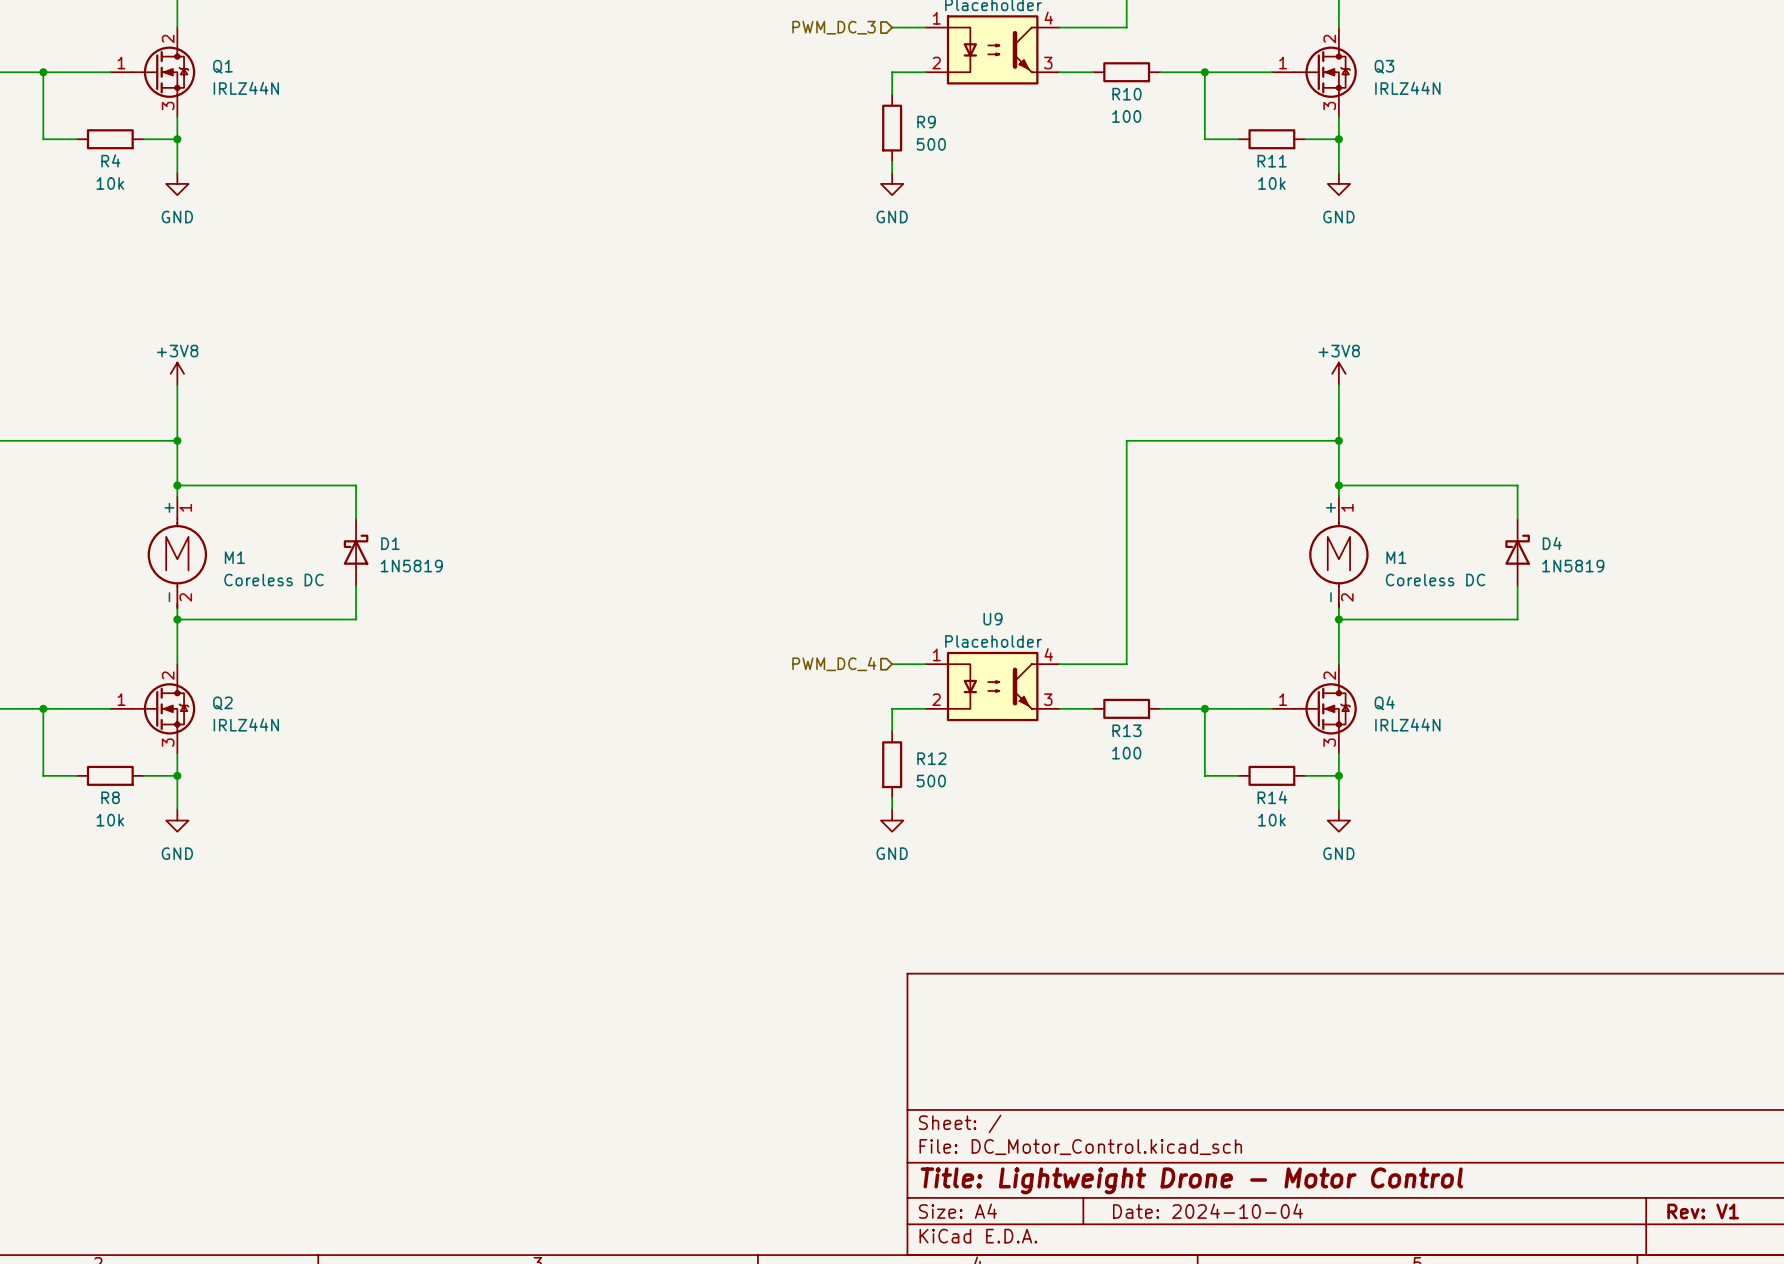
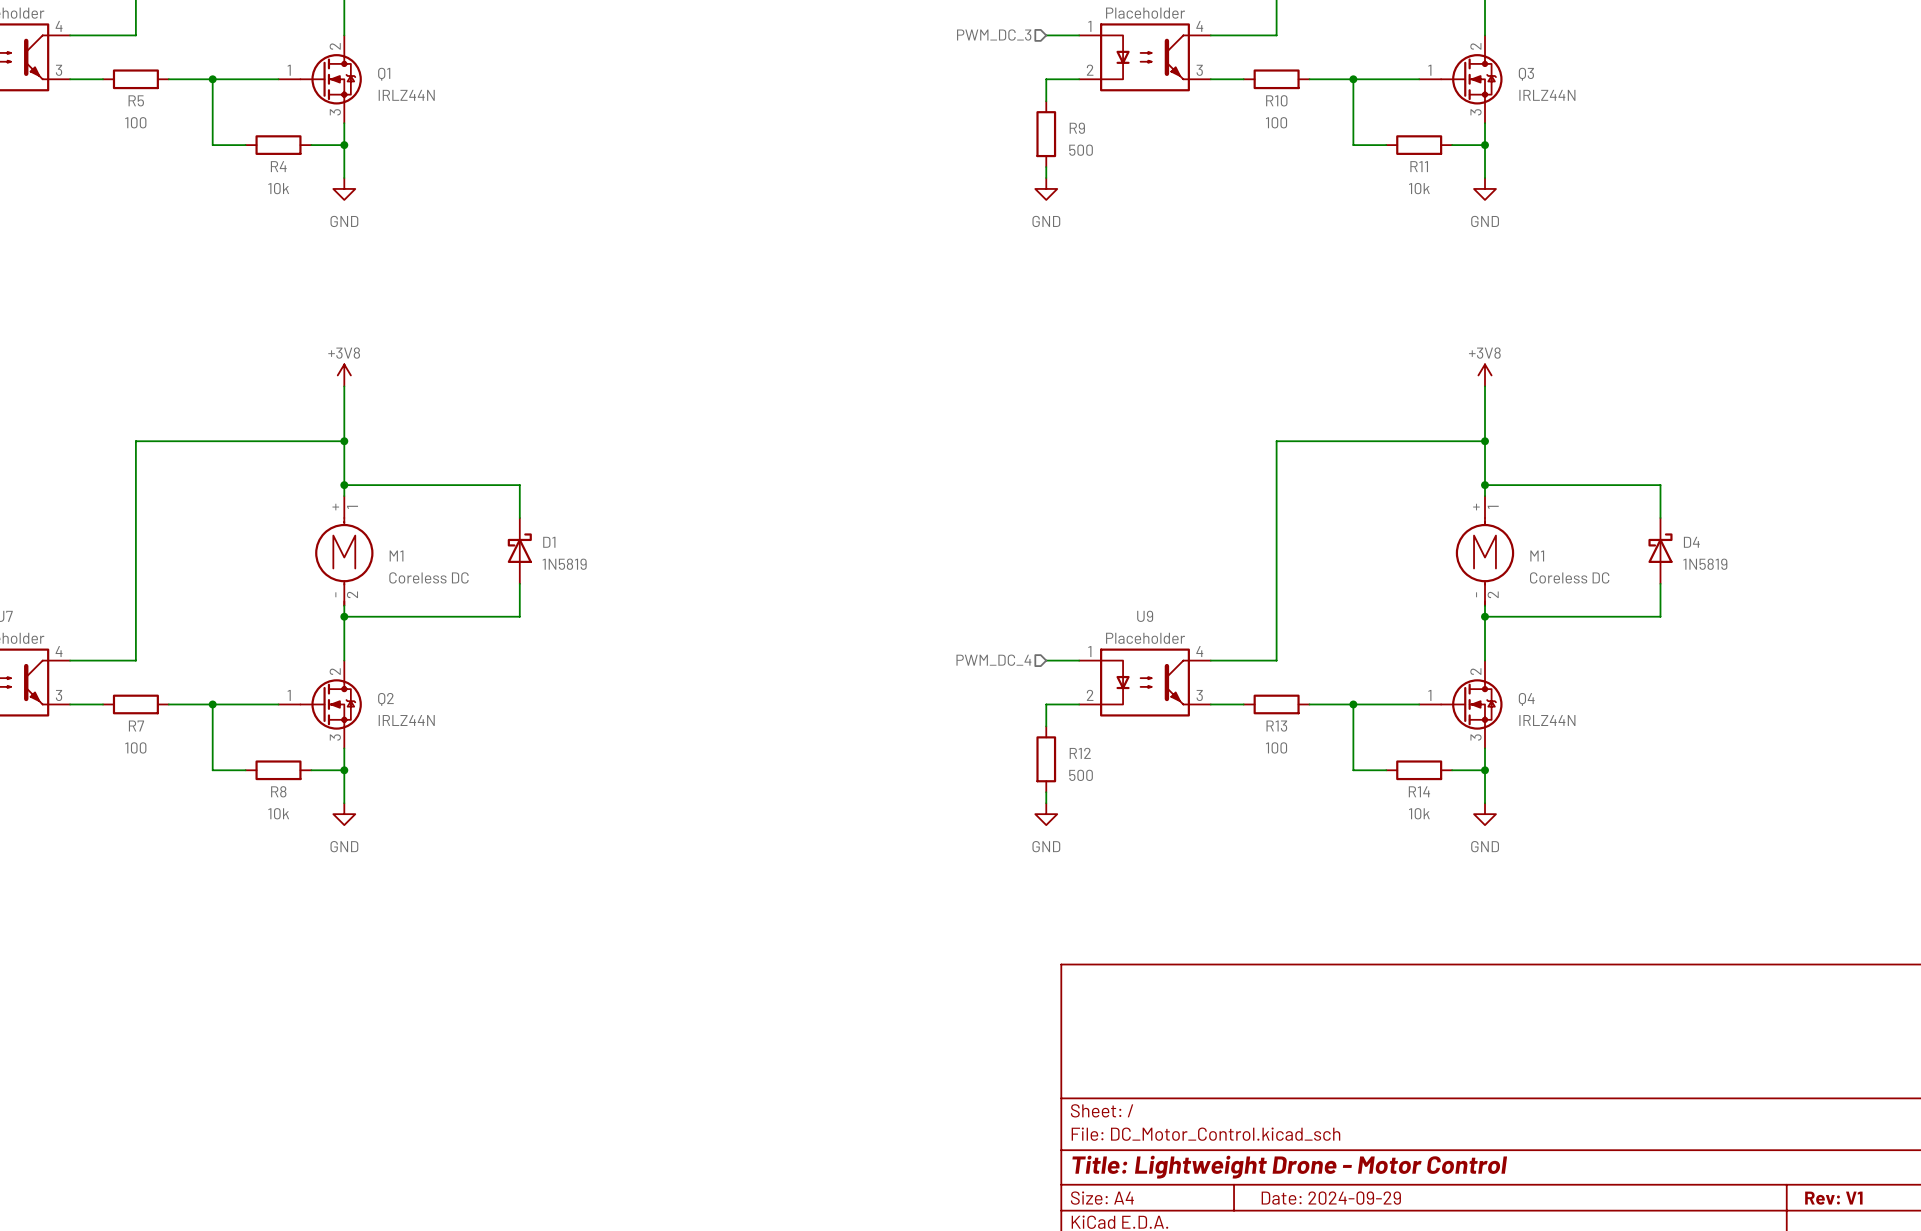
title block: Date: 2024-10-04 (1207, 1211) -> Date: 2024-09-29 (1331, 1198)

